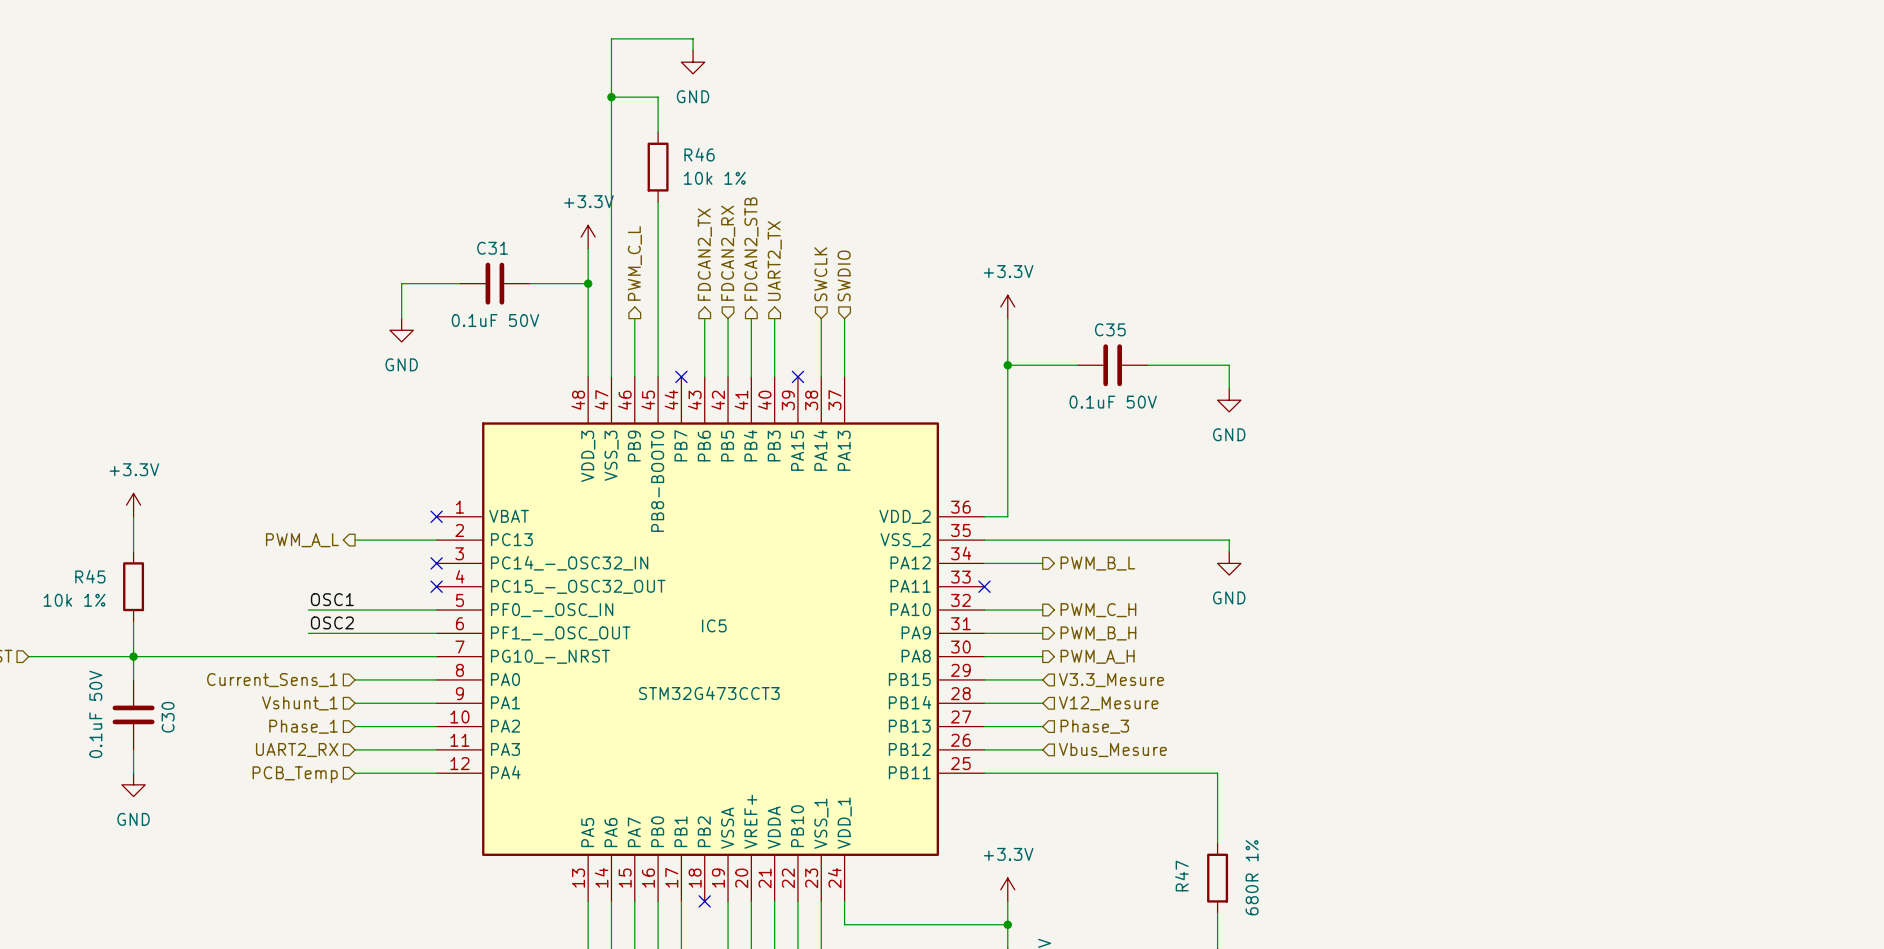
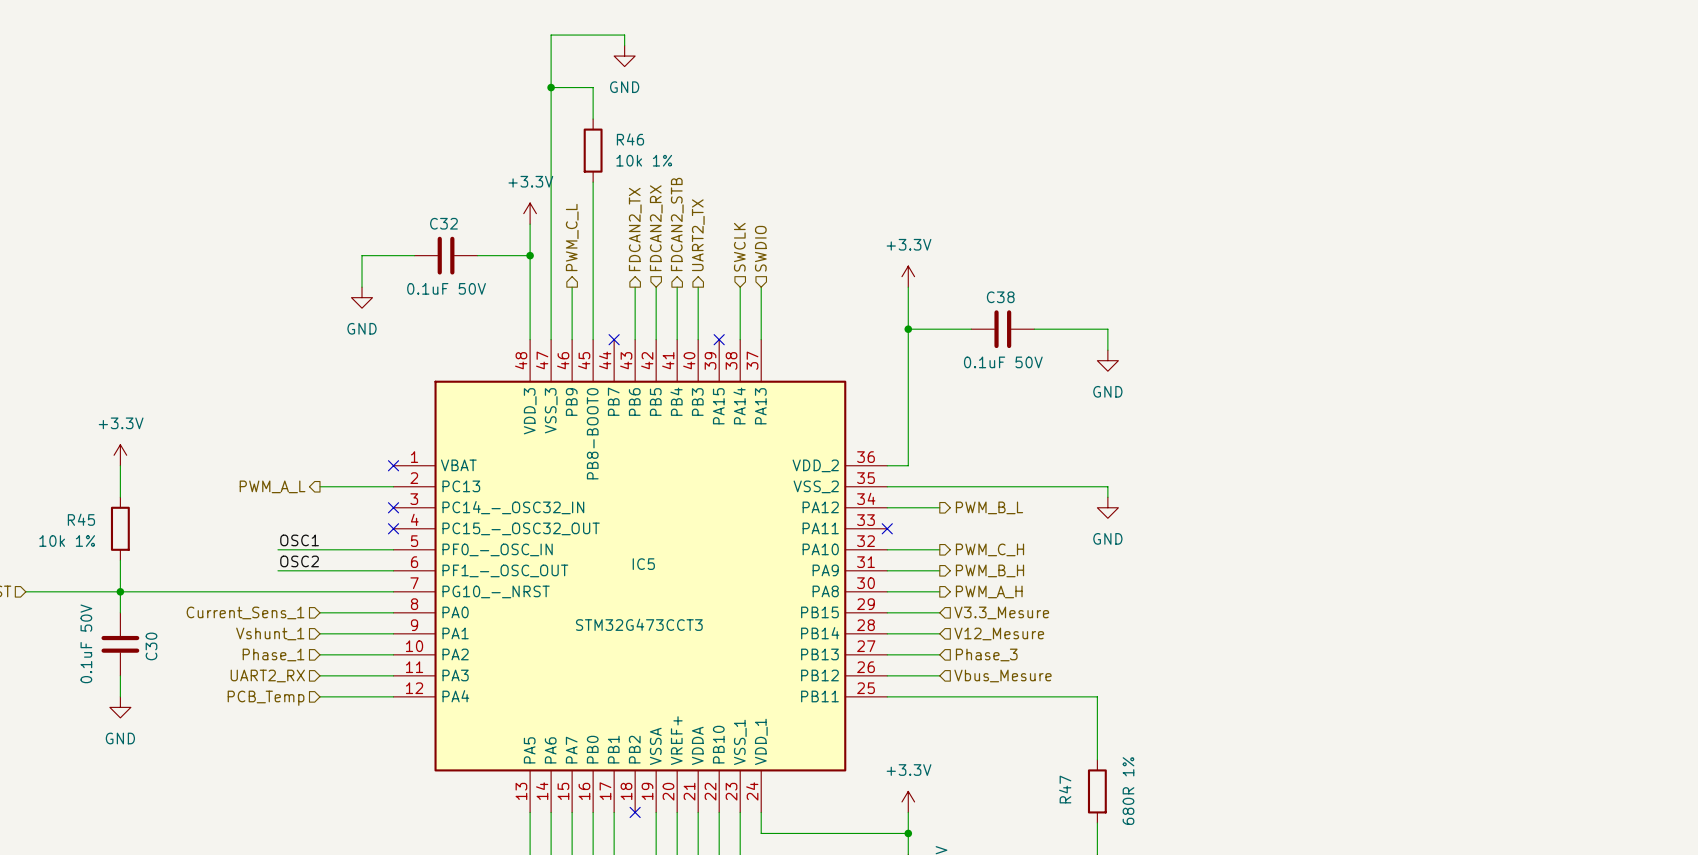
C31 name: C31 (492, 248) -> C32 (443, 223)
C35 name: C35 (1110, 329) -> C38 (1000, 297)

